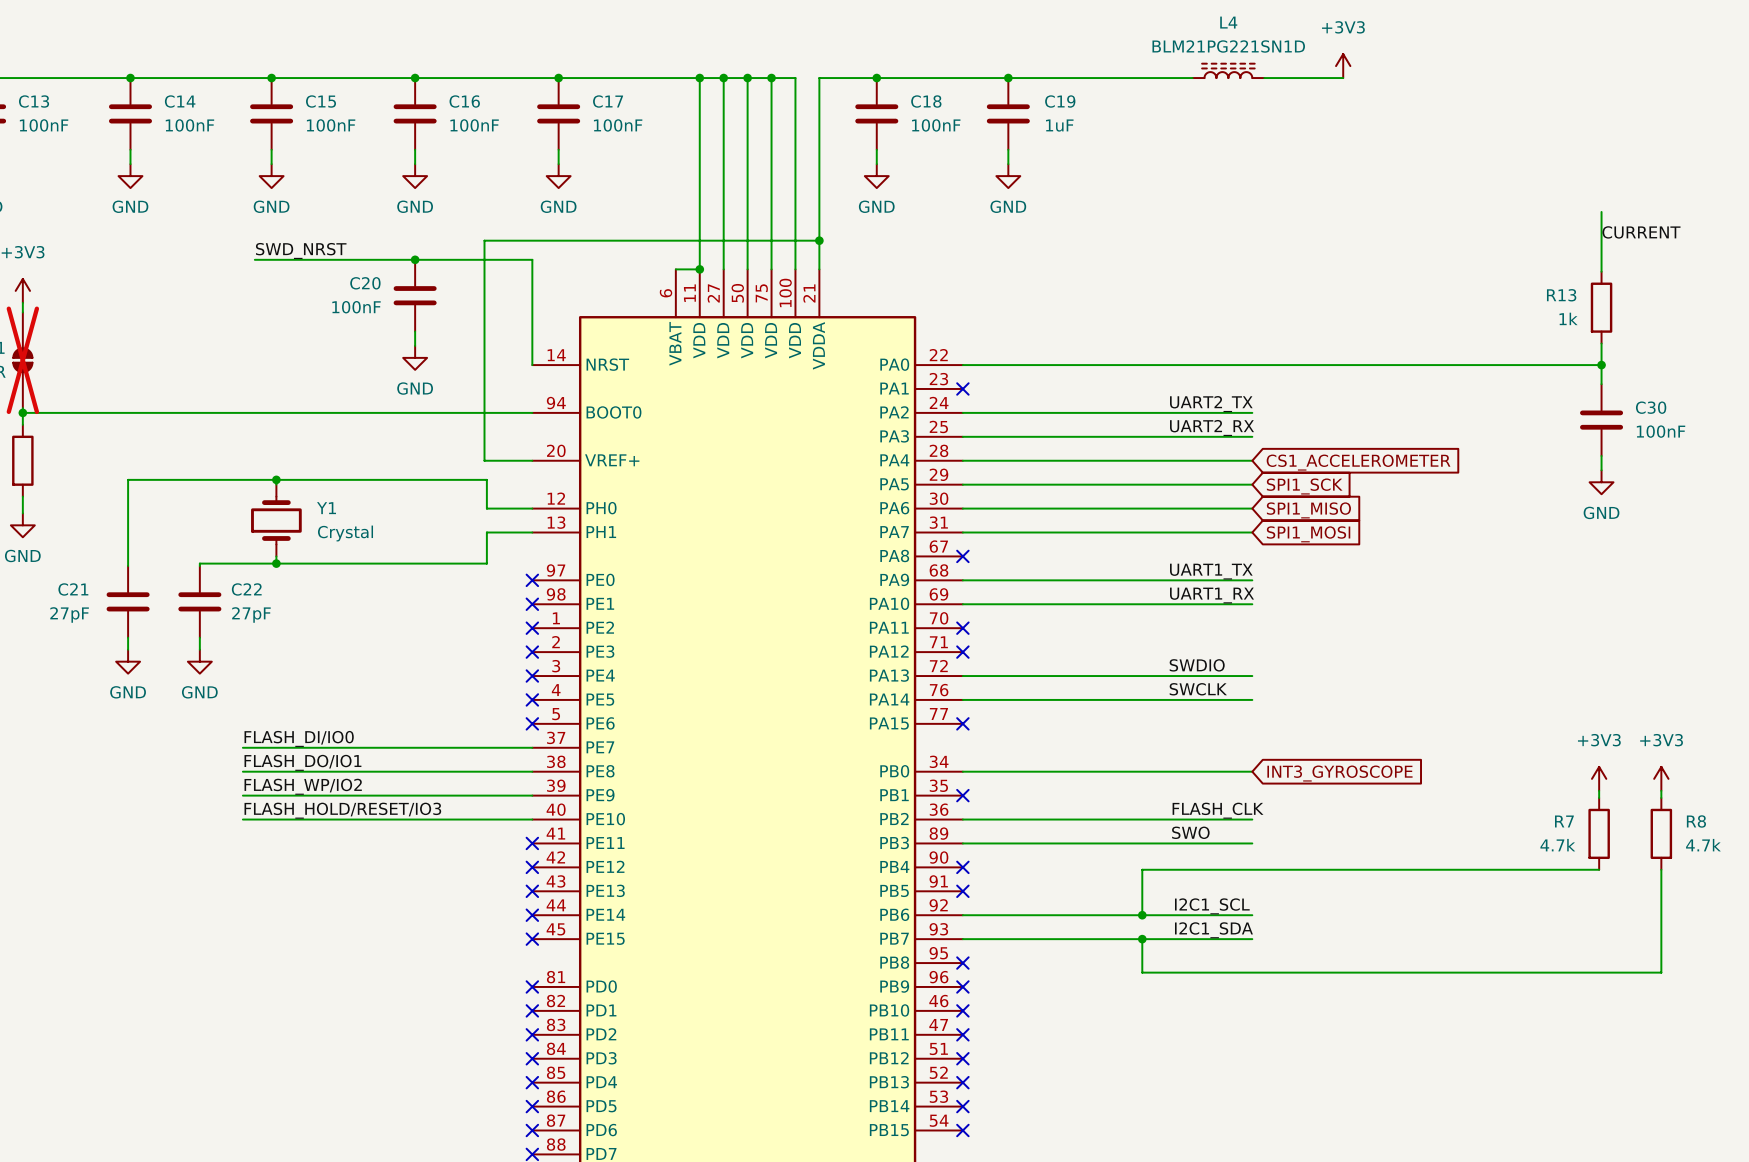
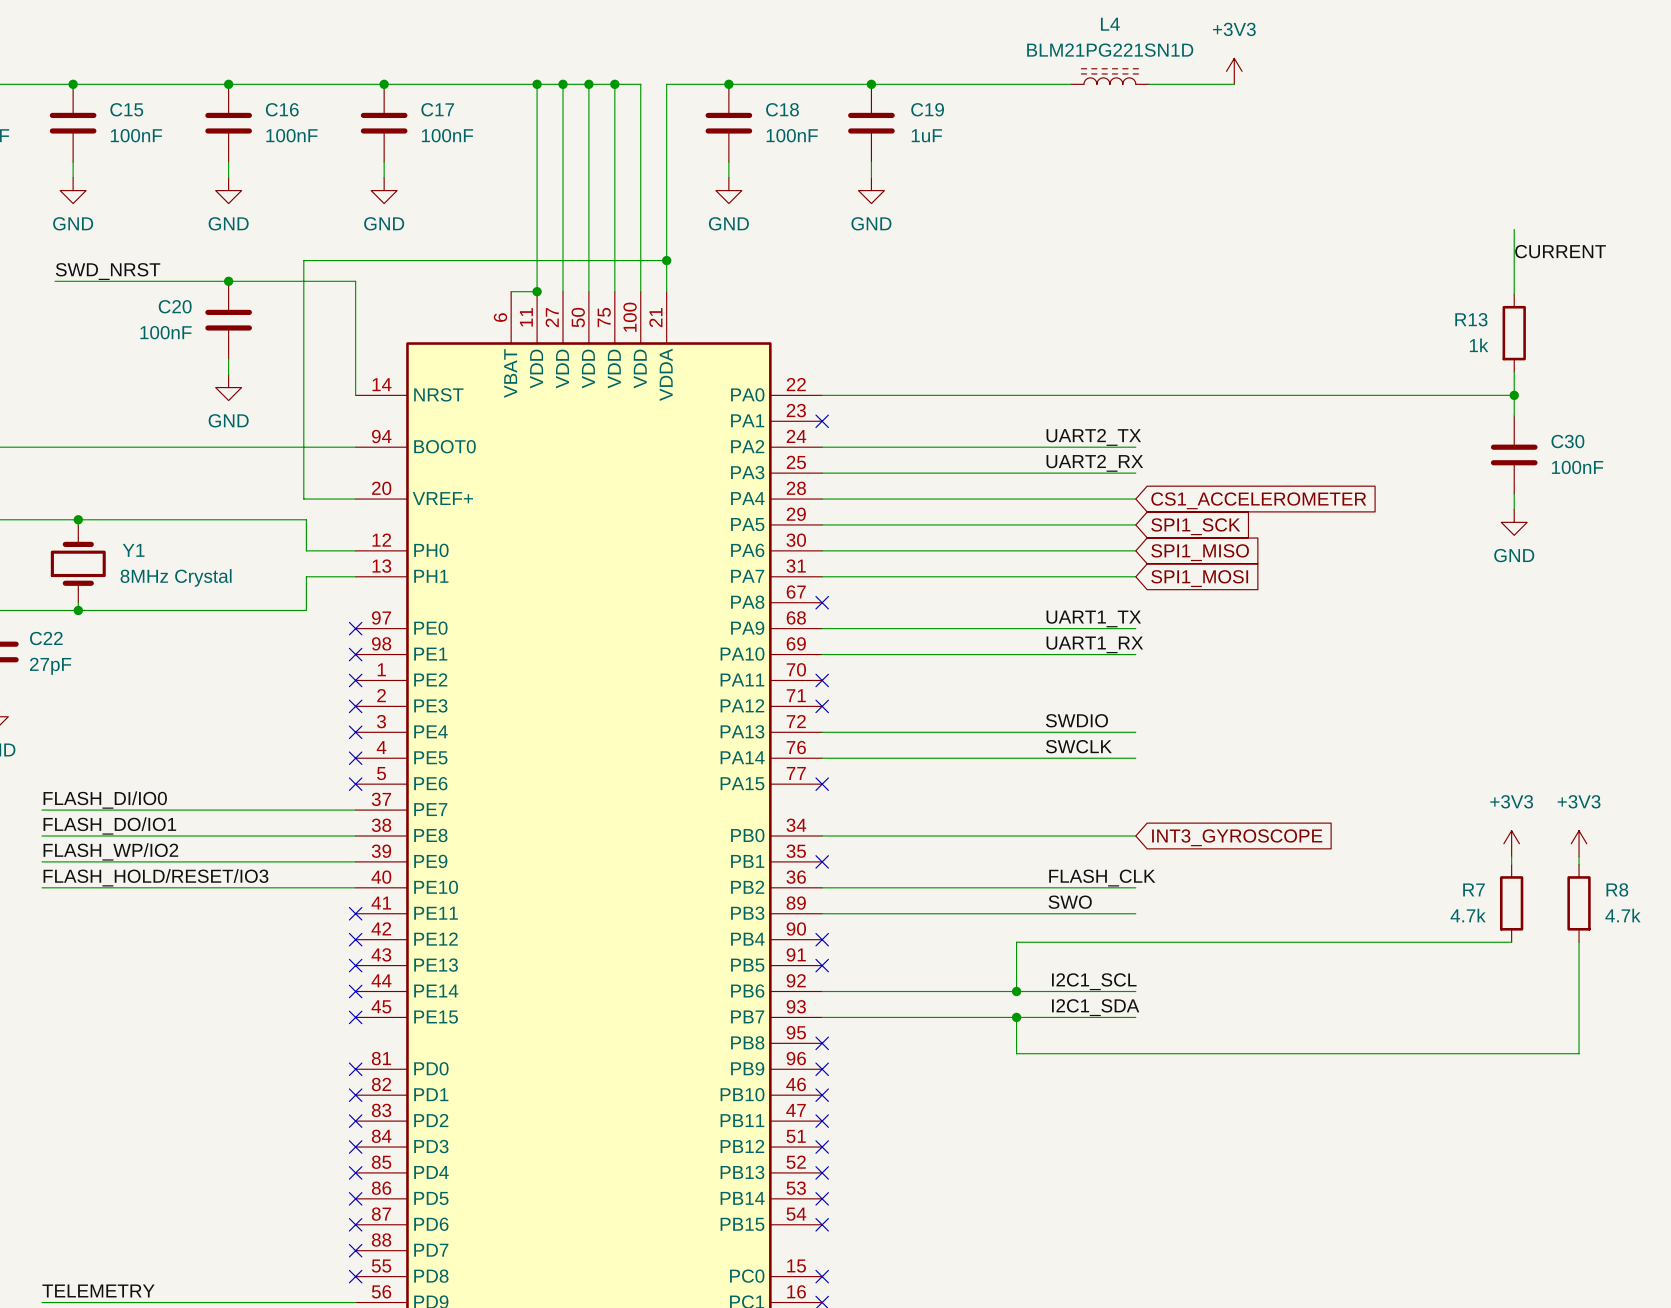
Y1 value: Crystal (345, 533) -> 8MHz Crystal (176, 577)

